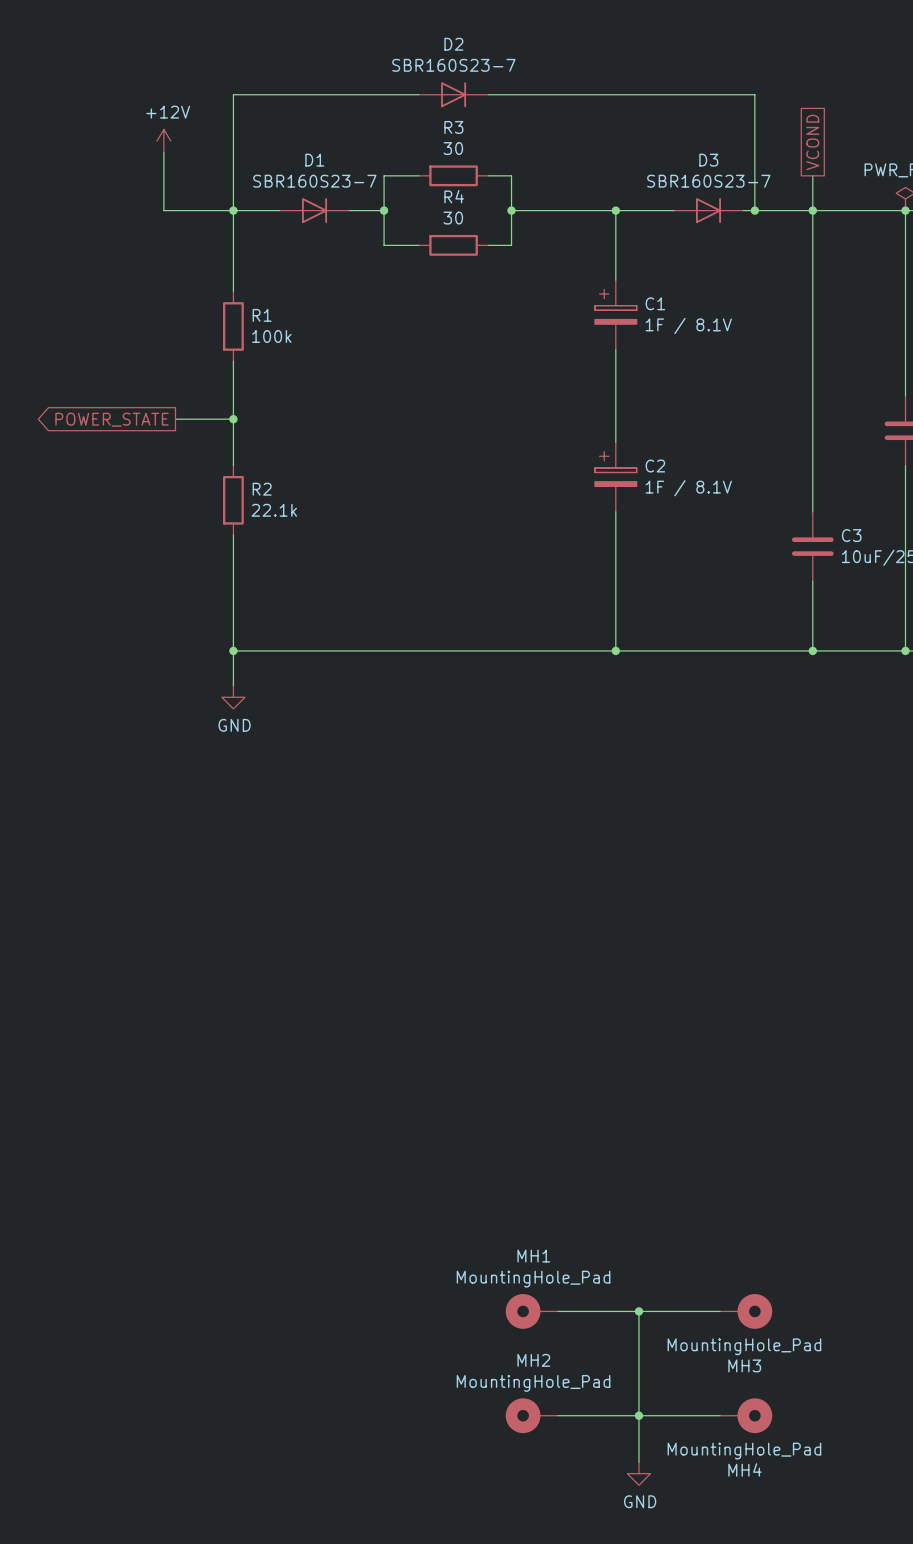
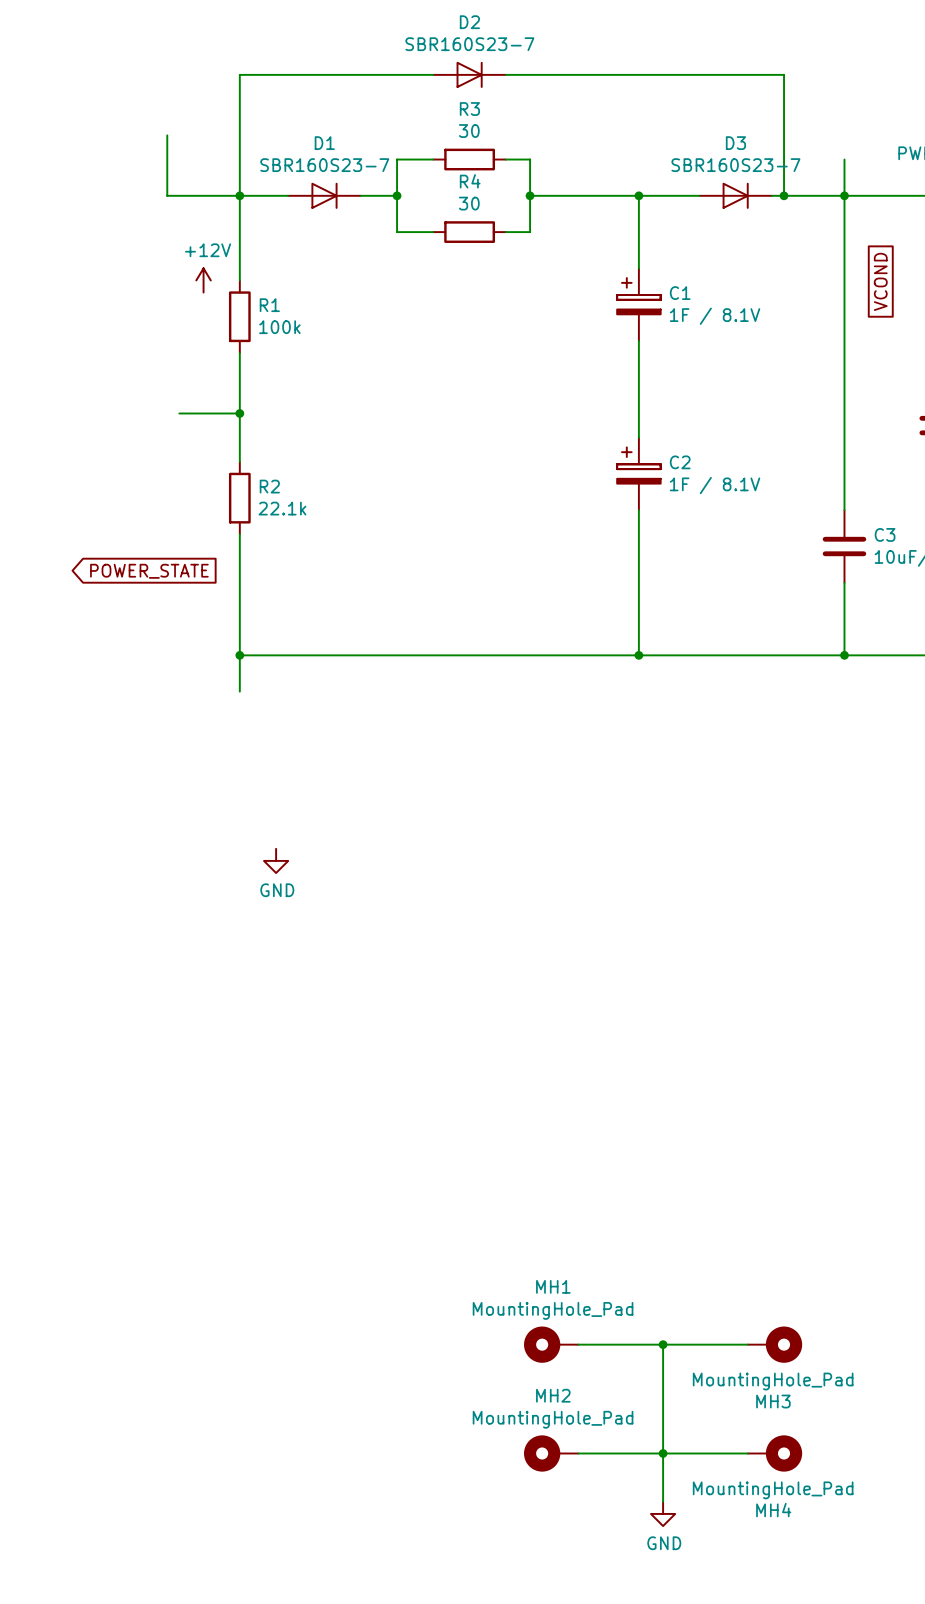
power symbol position: +12V (163, 141) -> +12V (203, 280)
global label position: VCOND (812, 142) -> VCOND (880, 281)
global label position: POWER_STATE (112, 419) -> POWER_STATE (149, 571)
power symbol position: GND (233, 697) -> GND (276, 860)

